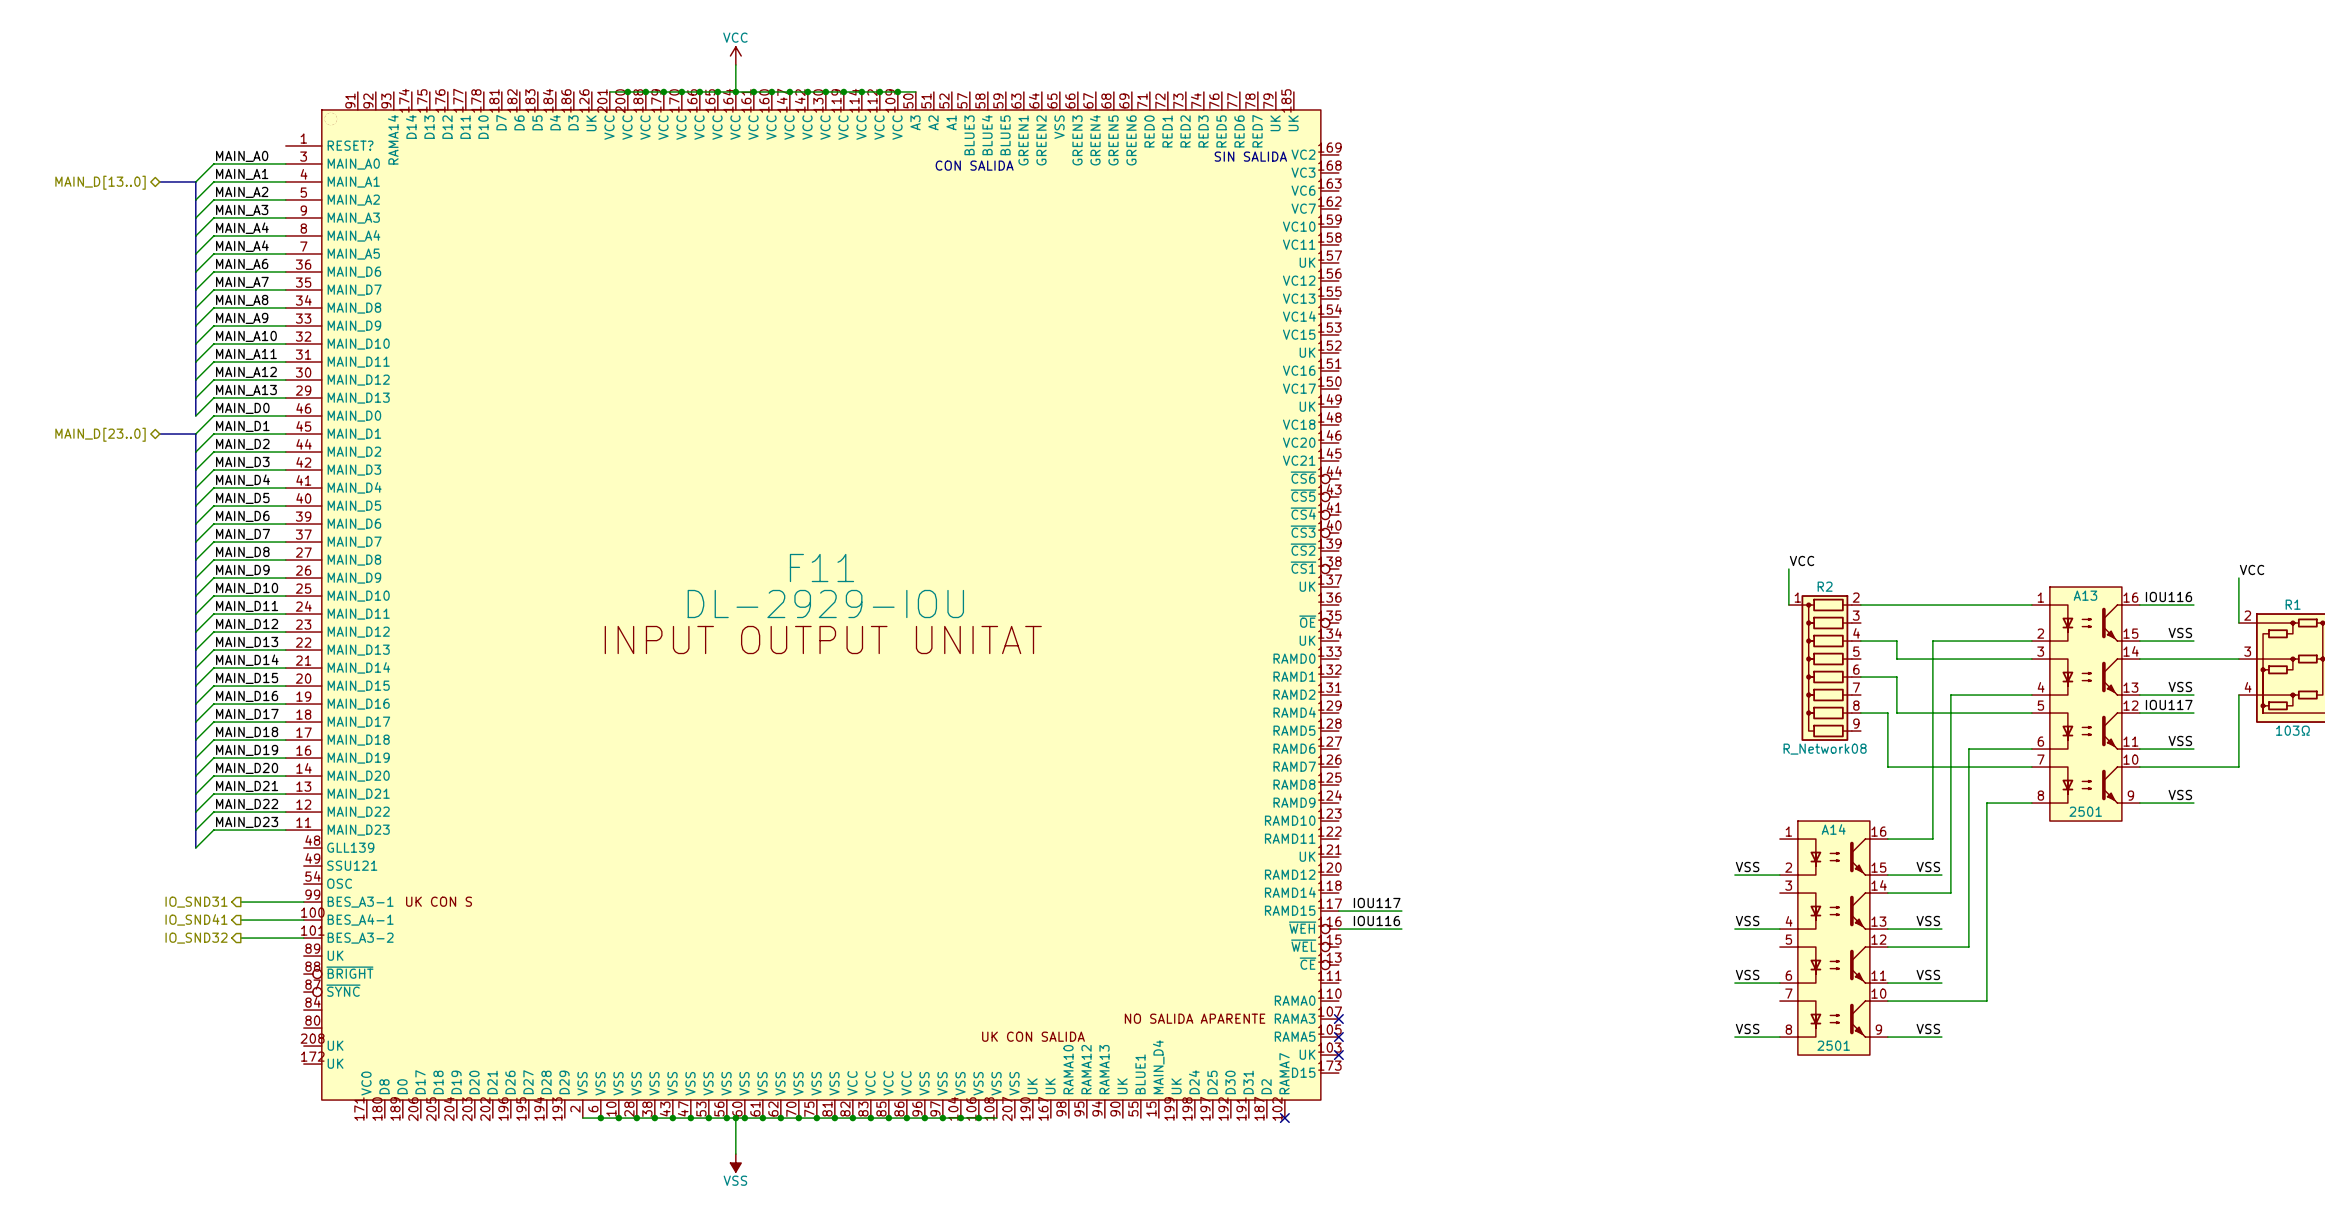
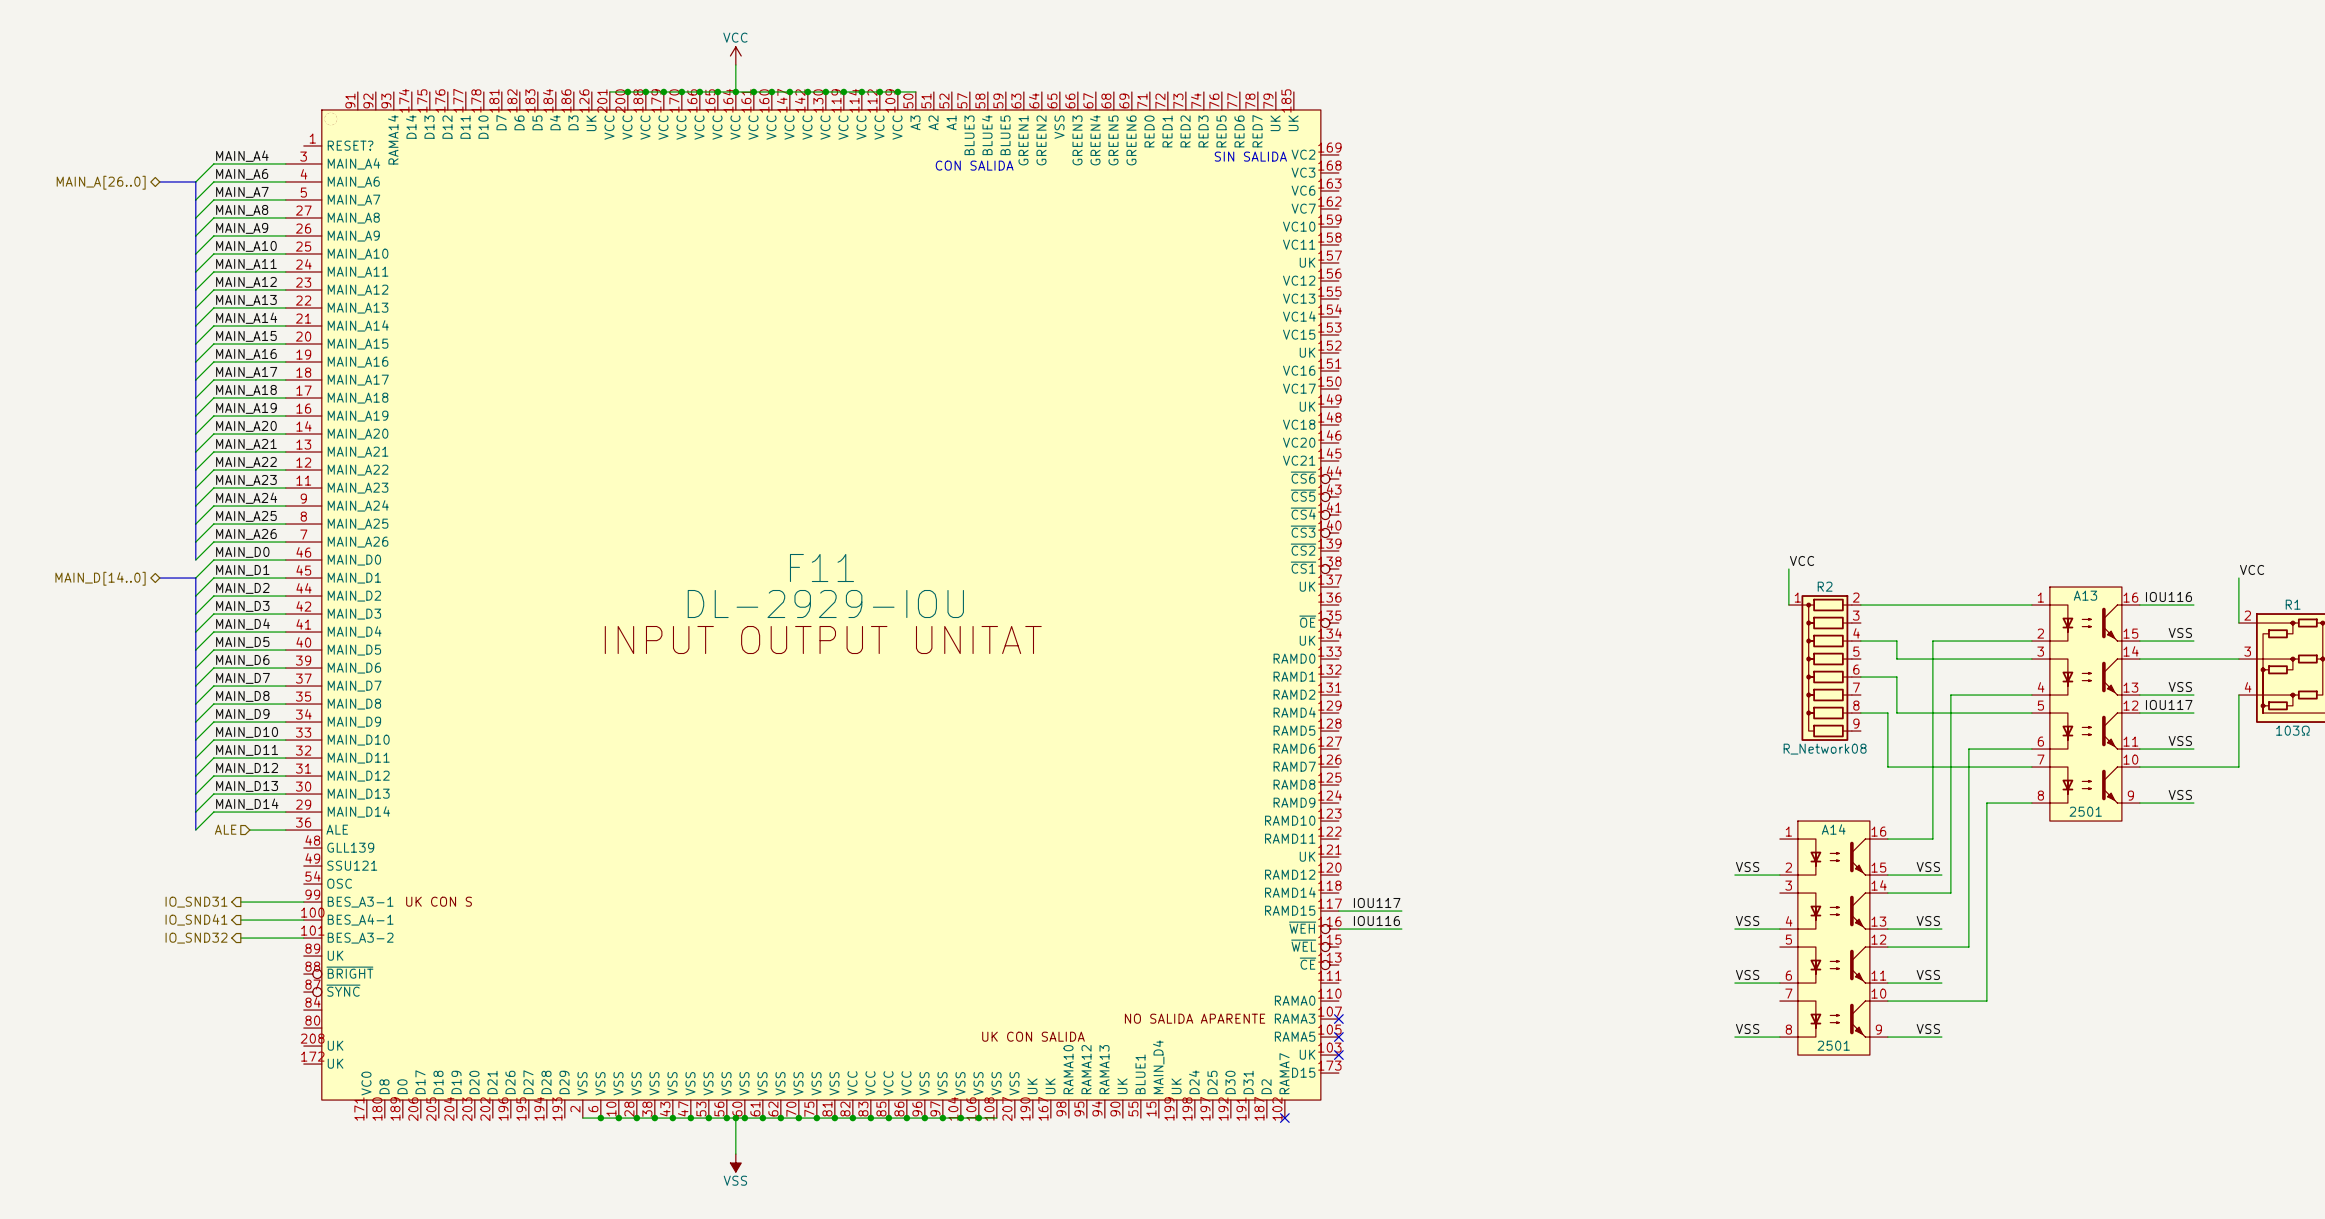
F11 symbol: [285, 91, 1339, 1119] -> [285, 91, 1339, 1119]
label: MAIN_A0 (242, 156) -> MAIN_A4 (242, 156)
label: MAIN_A1 (242, 174) -> MAIN_A6 (242, 174)
hierarchical label: MAIN_D[13..0] (100, 182) -> MAIN_A[26..0] (101, 182)
label: MAIN_A2 (242, 192) -> MAIN_A7 (242, 192)
label: MAIN_A3 (242, 210) -> MAIN_A8 (242, 210)
label: MAIN_A4 (242, 228) -> MAIN_A9 (242, 228)
label: MAIN_A4 (242, 246) -> MAIN_A10 (246, 246)
label: MAIN_A6 (242, 264) -> MAIN_A11 (246, 264)
label: MAIN_A7 (242, 282) -> MAIN_A12 (246, 282)
label: MAIN_A8 (242, 300) -> MAIN_A13 (246, 300)
label: MAIN_A9 (242, 318) -> MAIN_A14 (246, 318)
label: MAIN_A10 (246, 336) -> MAIN_A15 (246, 336)
label: MAIN_A11 (246, 354) -> MAIN_A16 (246, 354)
label: MAIN_A12 (246, 372) -> MAIN_A17 (246, 372)
label: MAIN_A13 (246, 390) -> MAIN_A18 (246, 390)
label: MAIN_D0 (242, 408) -> MAIN_A19 (246, 408)
label: MAIN_D1 (242, 426) -> MAIN_A20 (246, 426)
hierarchical label: MAIN_D[23..0] (100, 434) -> none
bus: (159, 434) (195, 434) -> (195, 416) (195, 434)
label: MAIN_D2 (242, 444) -> MAIN_A21 (246, 444)
label: MAIN_D3 (242, 462) -> MAIN_A22 (246, 462)
label: MAIN_D4 (243, 480) -> MAIN_A23 (246, 480)
label: MAIN_D5 (242, 498) -> MAIN_A24 (246, 498)
label: MAIN_D6 (242, 516) -> MAIN_A25 (246, 516)
label: MAIN_D7 (243, 534) -> MAIN_A26 (246, 534)
label: MAIN_D8 (242, 552) -> MAIN_D0 (242, 552)
bus: (195, 560) (195, 578) -> (159, 578) (195, 578)
label: MAIN_D9 (242, 570) -> MAIN_D1 (242, 570)
hierarchical label: none -> MAIN_D[14..0] (100, 578)
label: MAIN_D10 (247, 588) -> MAIN_D2 (242, 588)
label: MAIN_D11 (247, 606) -> MAIN_D3 (242, 606)
label: MAIN_D12 (247, 624) -> MAIN_D4 (243, 624)
label: MAIN_D13 (247, 642) -> MAIN_D5 (242, 642)
label: MAIN_D14 (247, 660) -> MAIN_D6 (242, 660)
label: MAIN_D15 (247, 678) -> MAIN_D7 (243, 678)
label: MAIN_D16 (247, 696) -> MAIN_D8 (242, 696)
label: MAIN_D17 (247, 714) -> MAIN_D9 (242, 714)
label: MAIN_D18 (247, 732) -> MAIN_D10 (247, 732)
label: MAIN_D19 (247, 750) -> MAIN_D11 (247, 750)
label: MAIN_D20 (247, 768) -> MAIN_D12 (247, 768)
label: MAIN_D21 (247, 786) -> MAIN_D13 (247, 786)
label: MAIN_D22 (247, 804) -> MAIN_D14 (247, 804)
label: MAIN_D23 (247, 822) -> none
hierarchical label: none -> ALE (225, 829)
bus: (195, 830) (195, 848) -> none
wire: (249, 830) (213, 830) (195, 848) -> none

